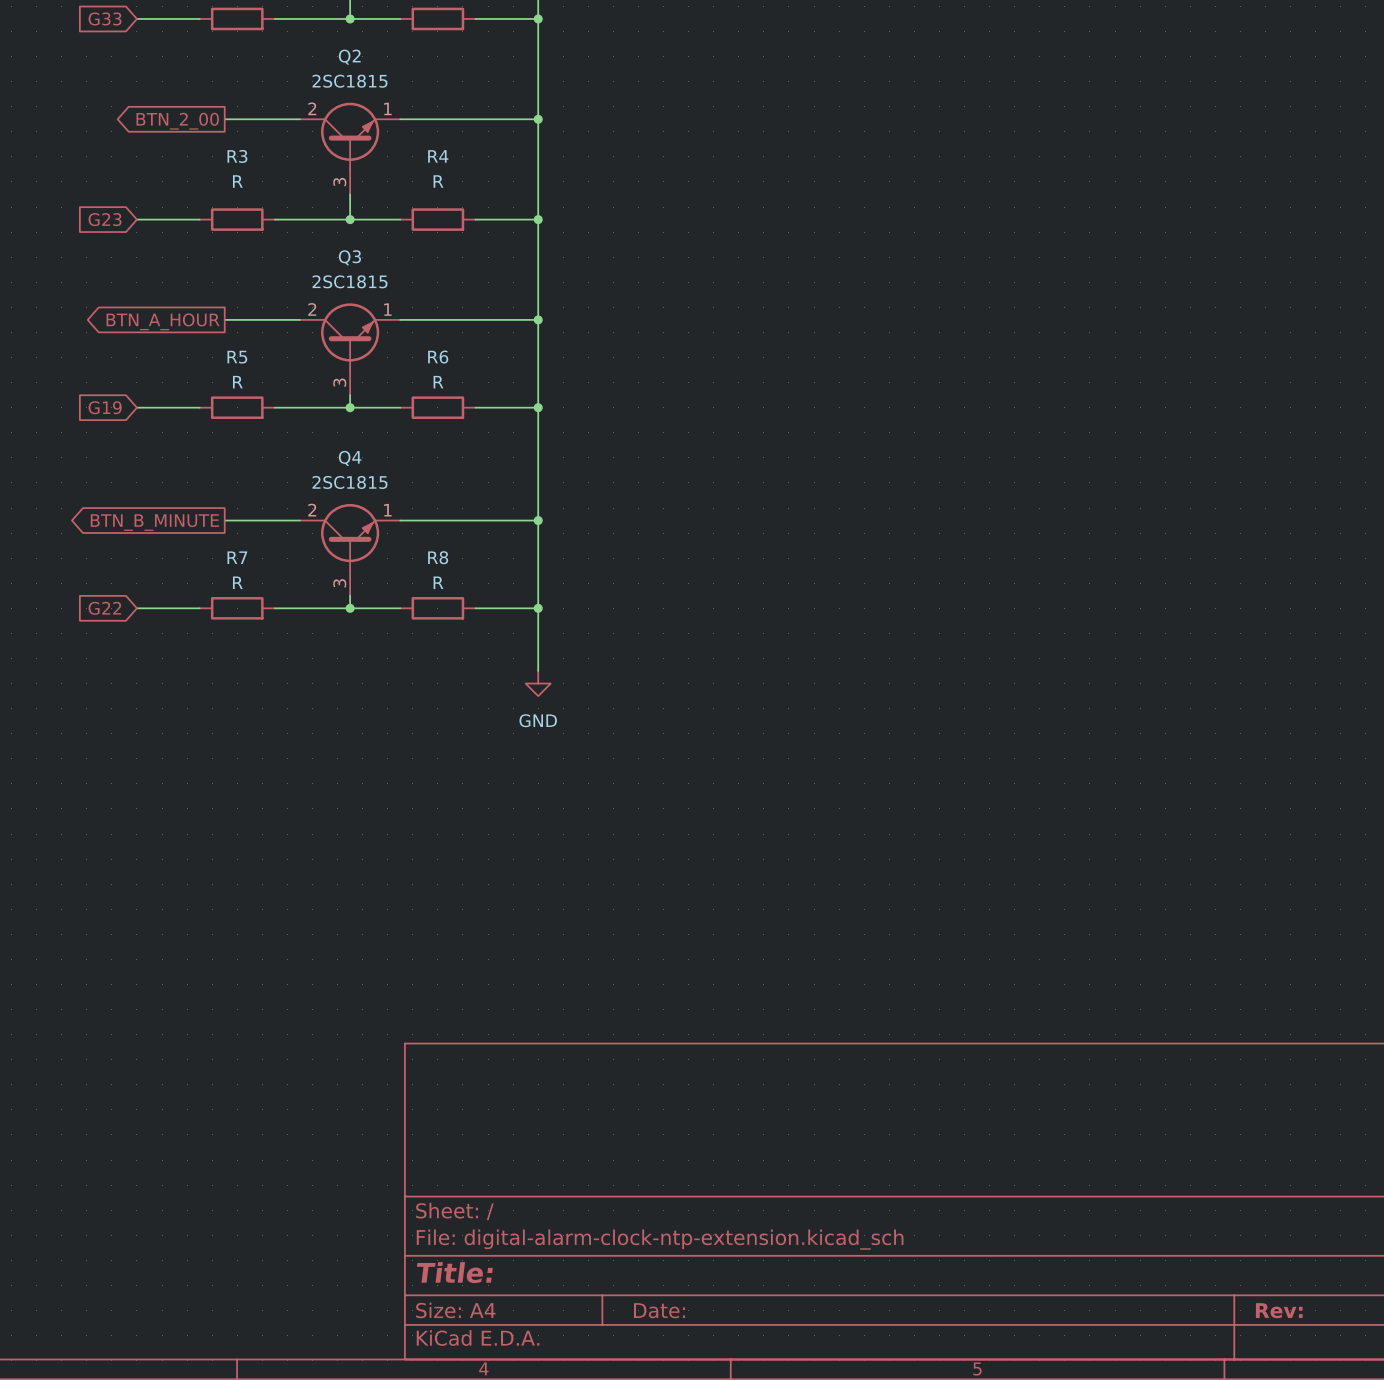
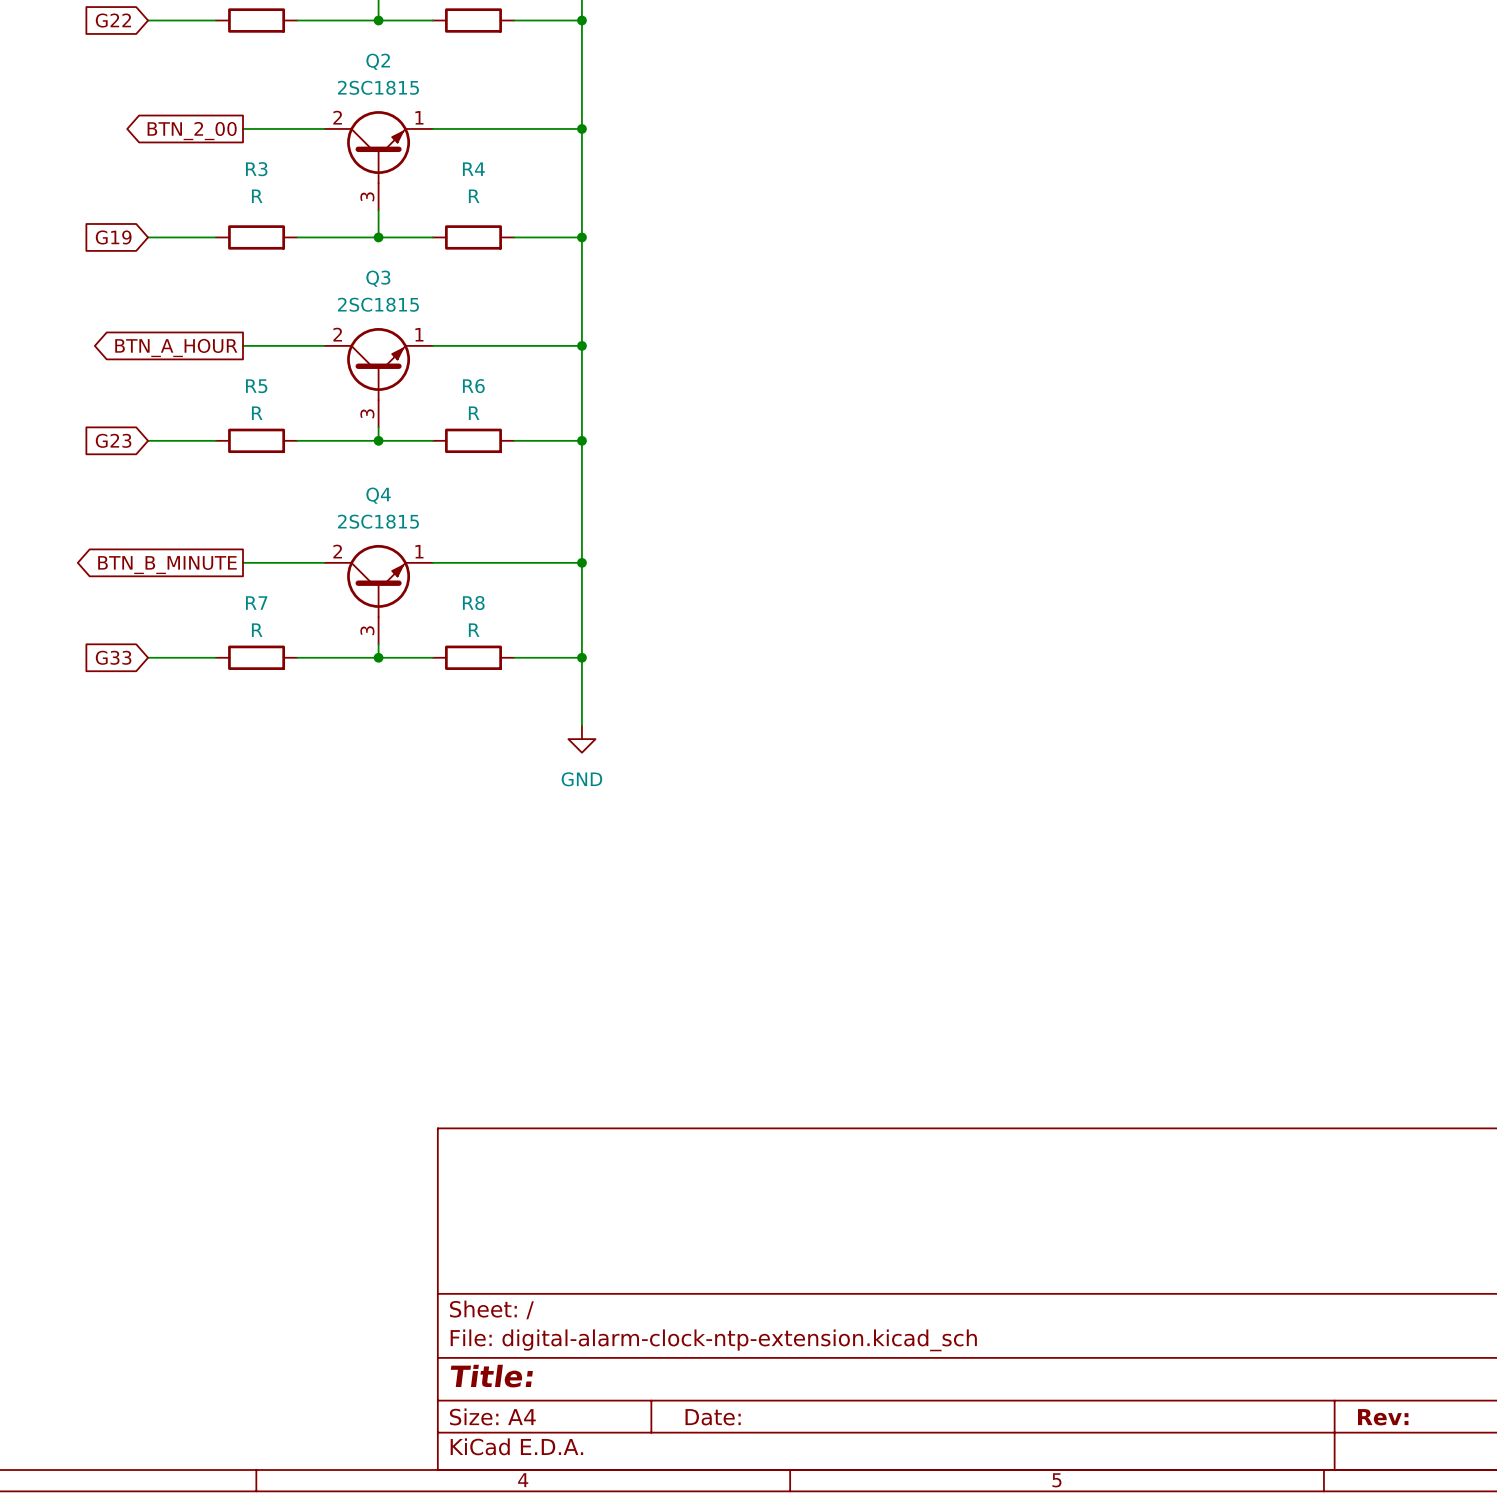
global label: G33 (105, 18) -> G22 (113, 20)
global label: G23 (105, 219) -> G19 (113, 237)
global label: G19 (105, 407) -> G23 (113, 440)
global label: G22 (104, 608) -> G33 (113, 657)

